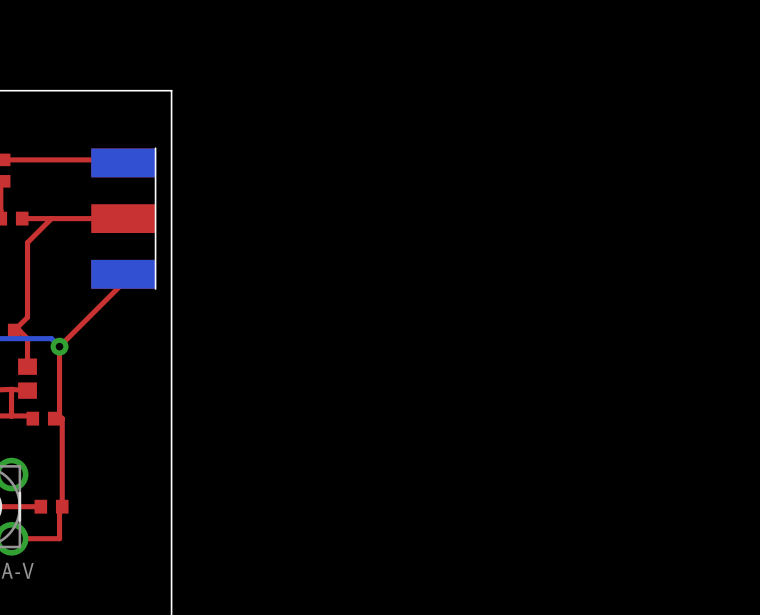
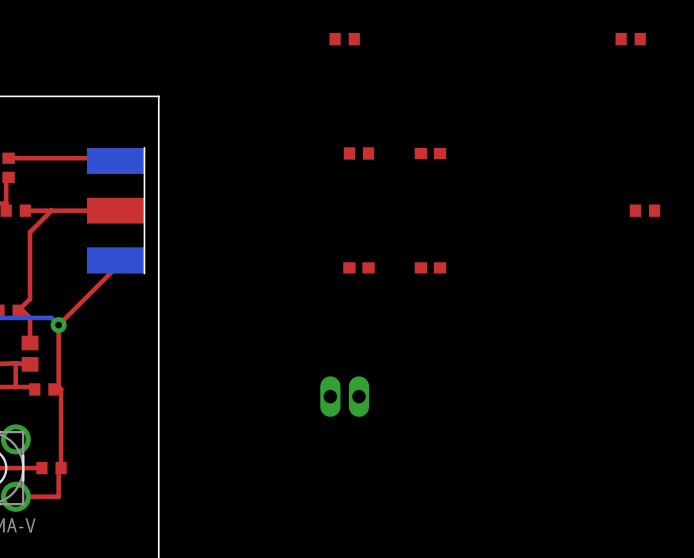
part: none -> (344, 39)
part: none -> (630, 39)
part: none -> (358, 153)
part: none -> (430, 153)
part: none -> (644, 210)
part: none -> (358, 267)
part: none -> (430, 267)
part: none -> (344, 396)

